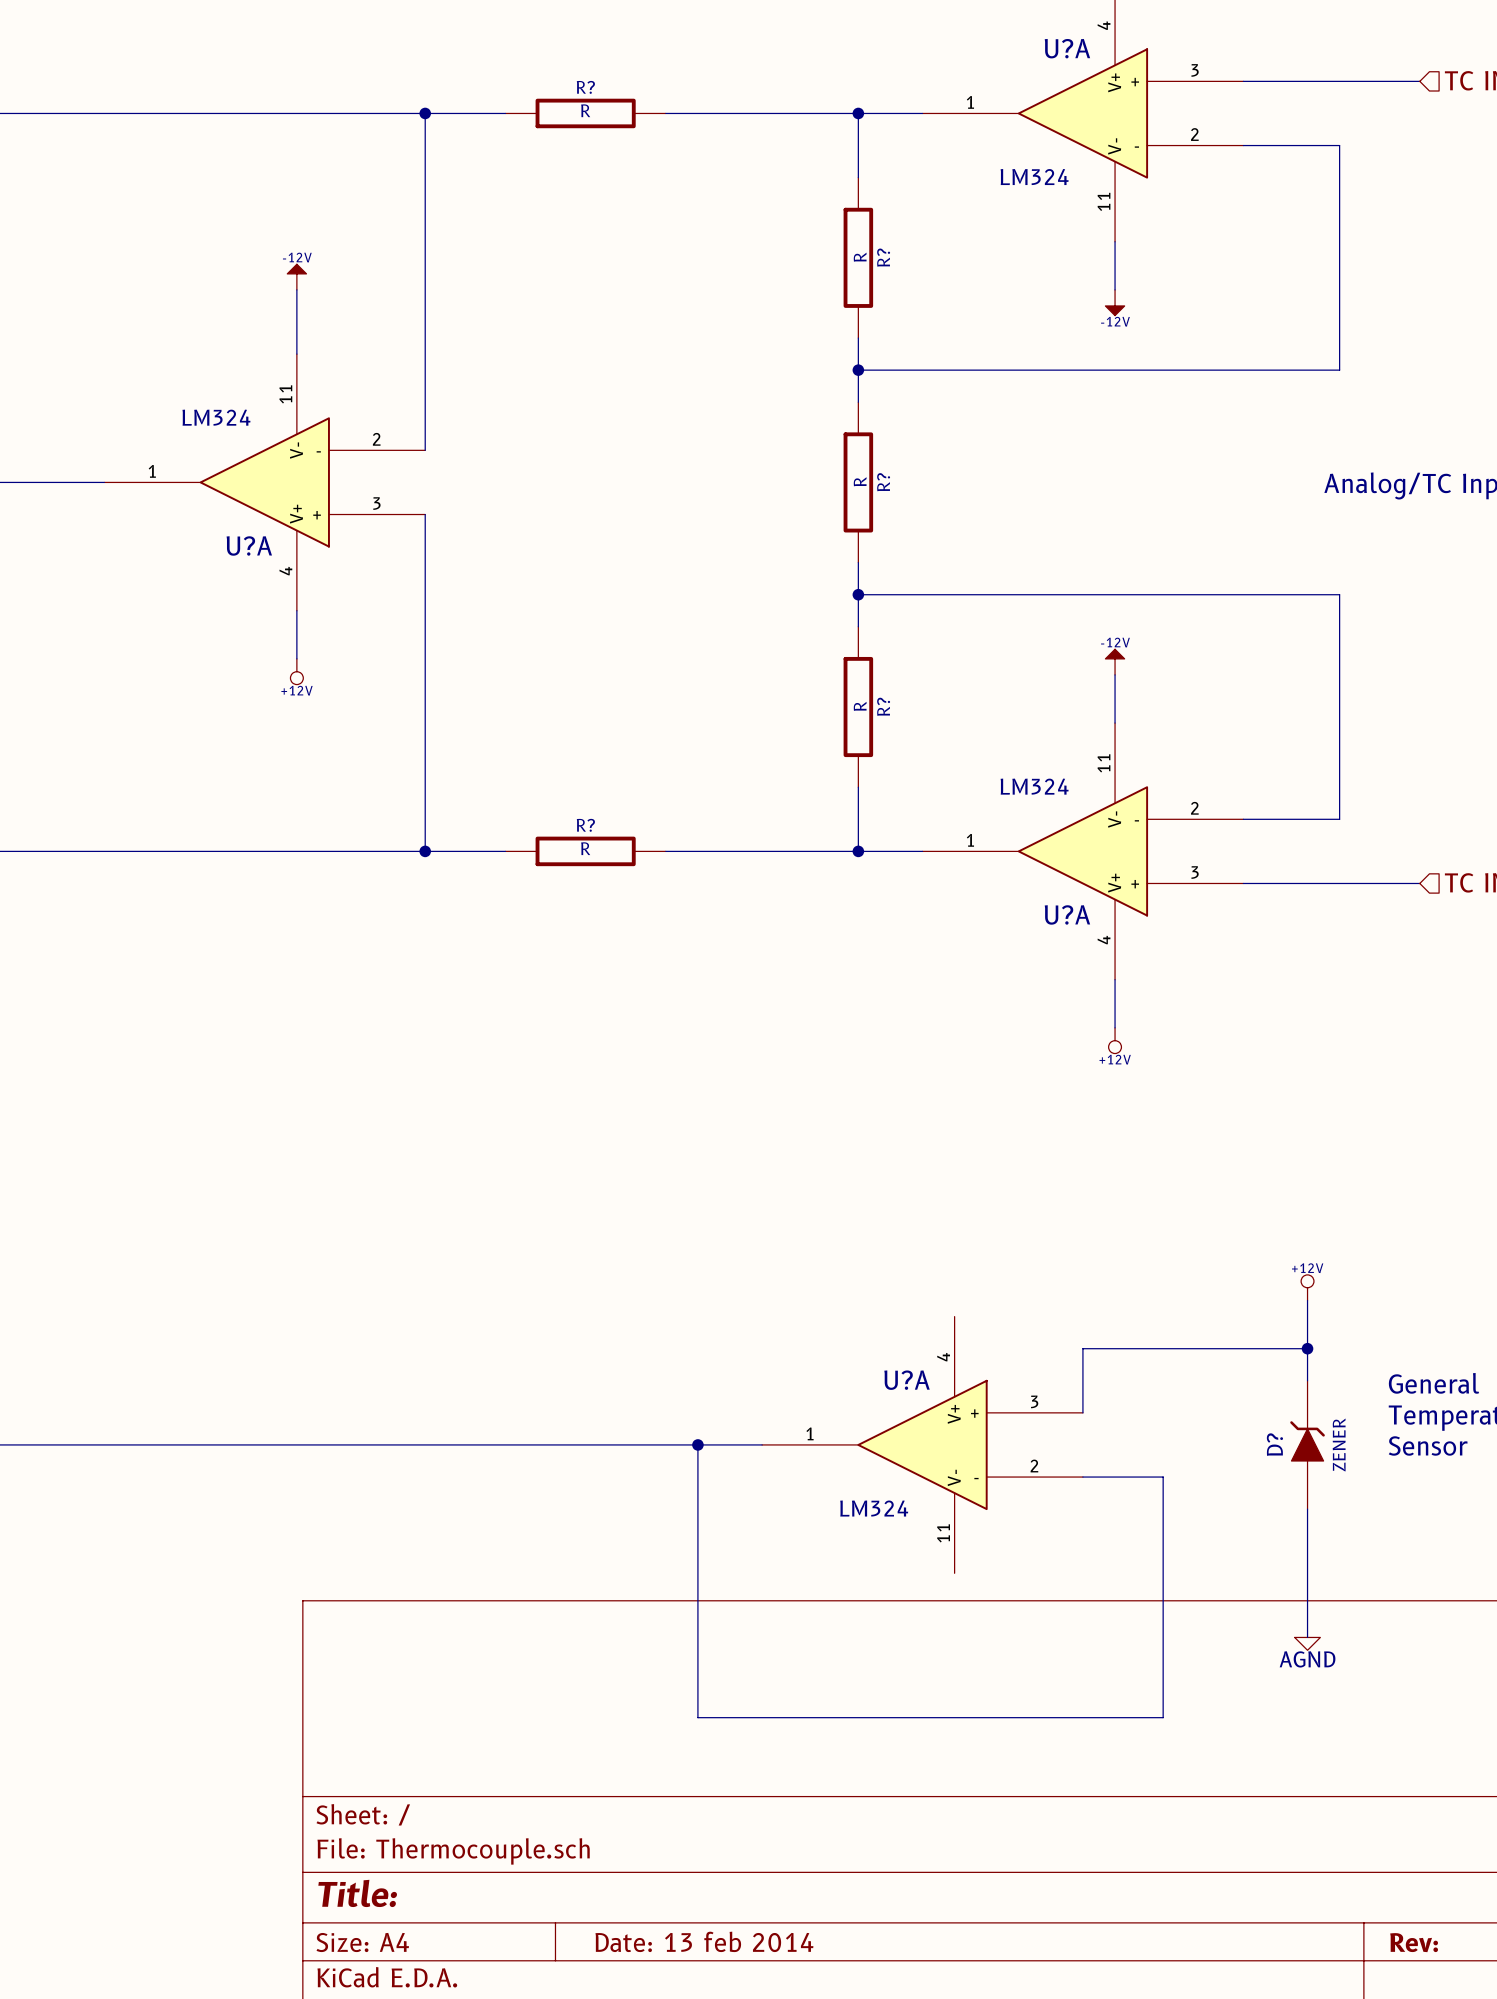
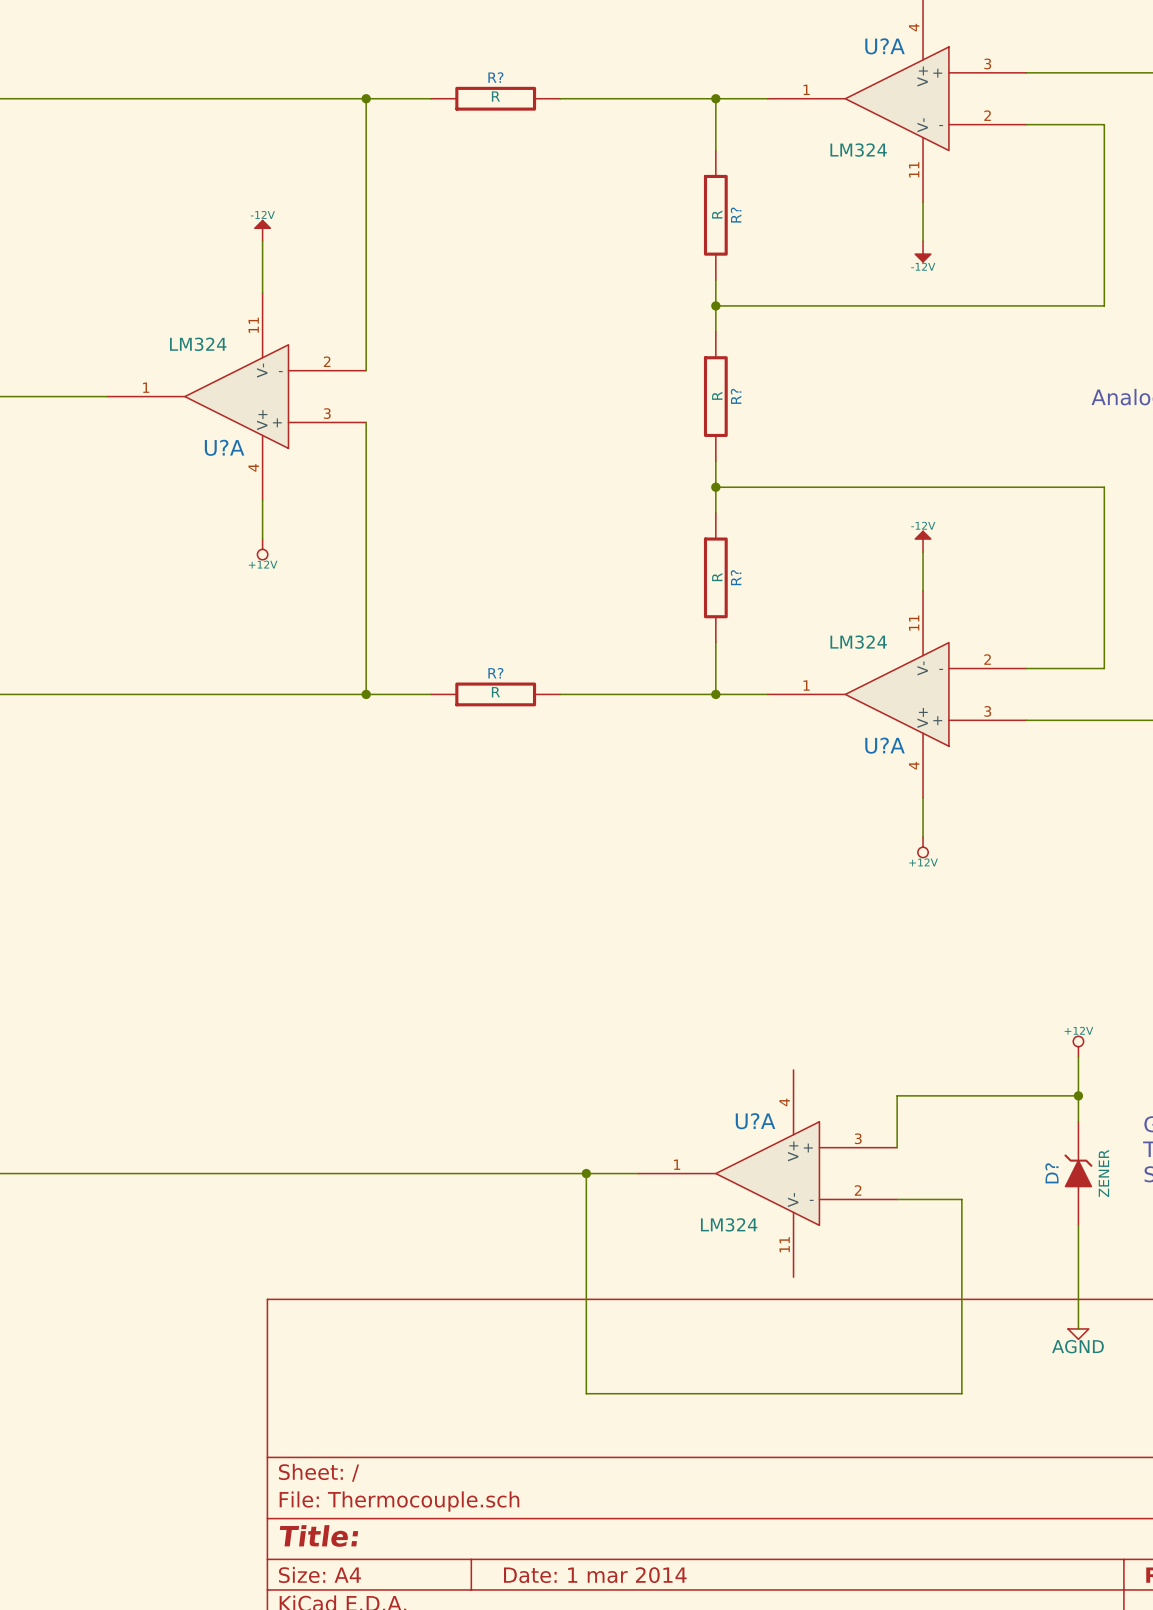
title block: Date: 13 feb 2014 (704, 1941) -> Date: 1 mar 2014 (595, 1575)

